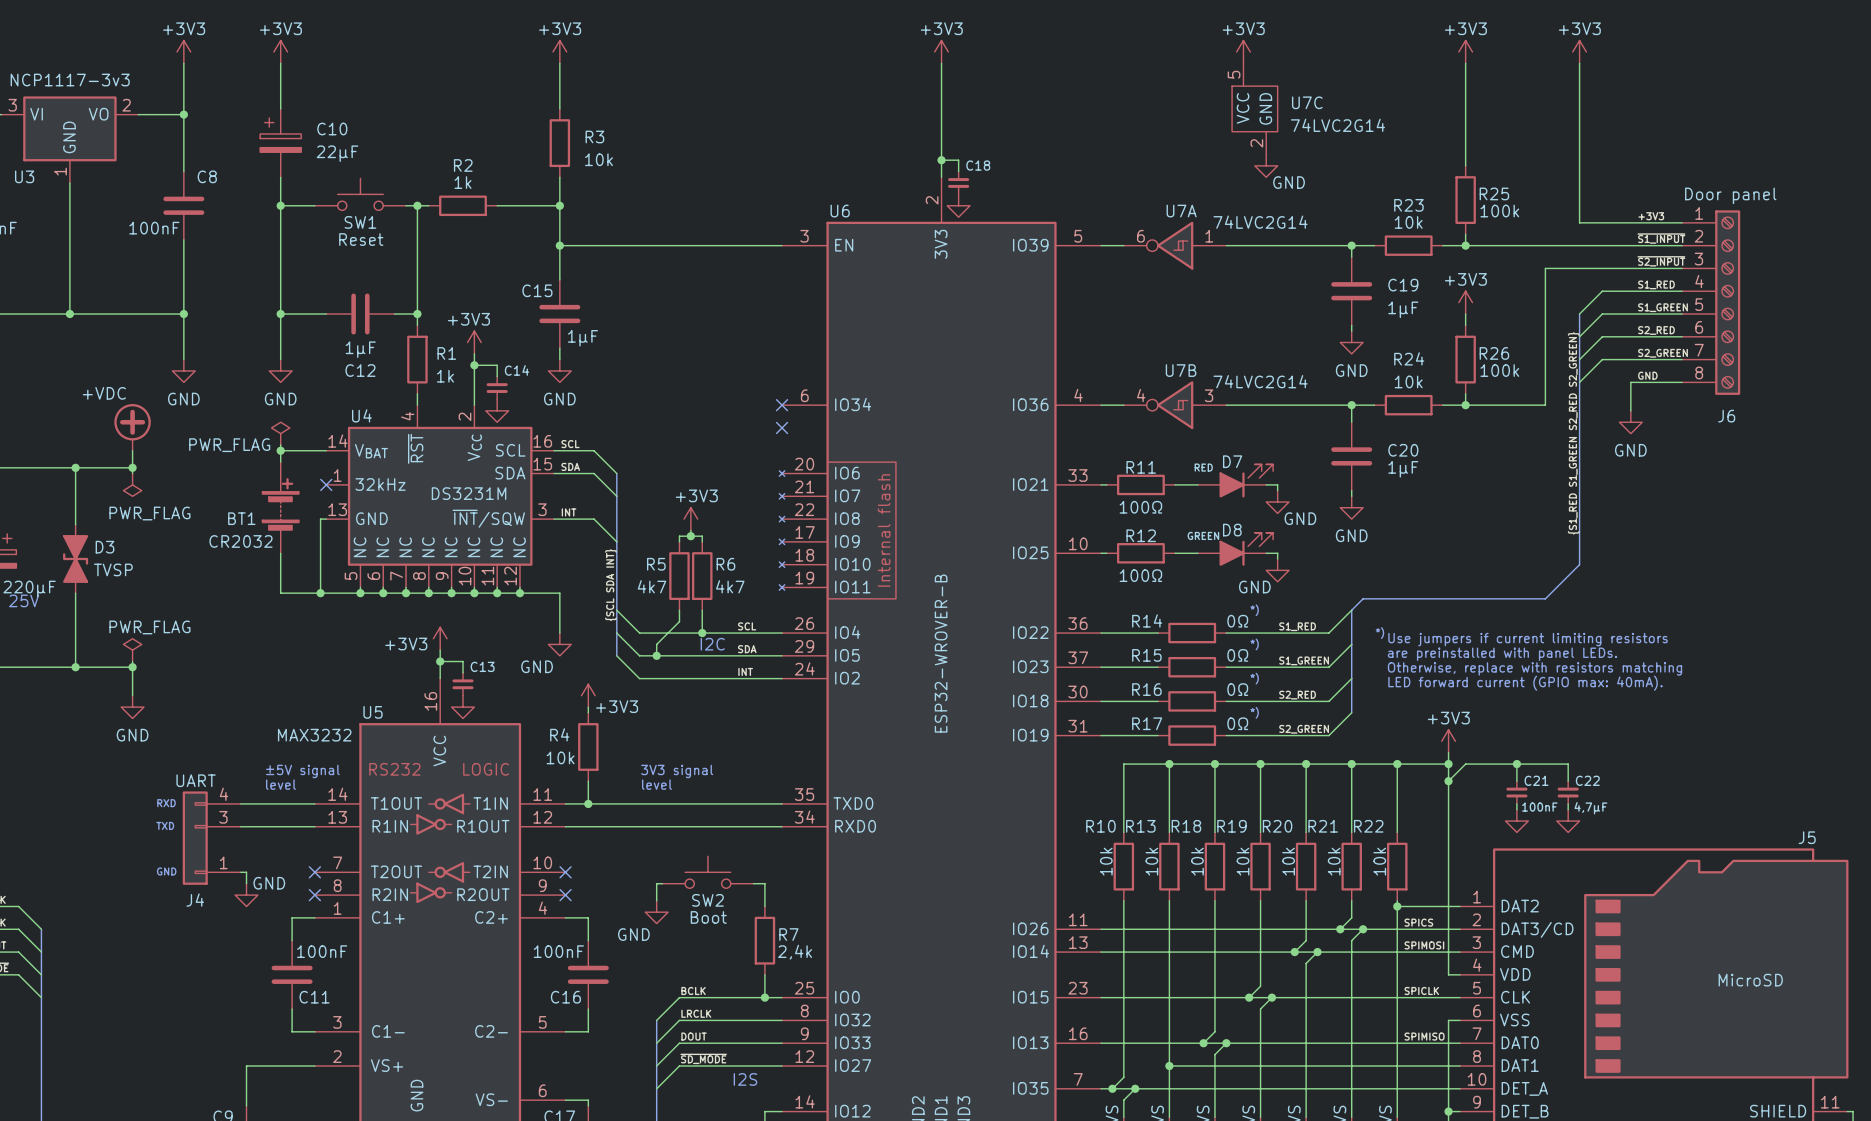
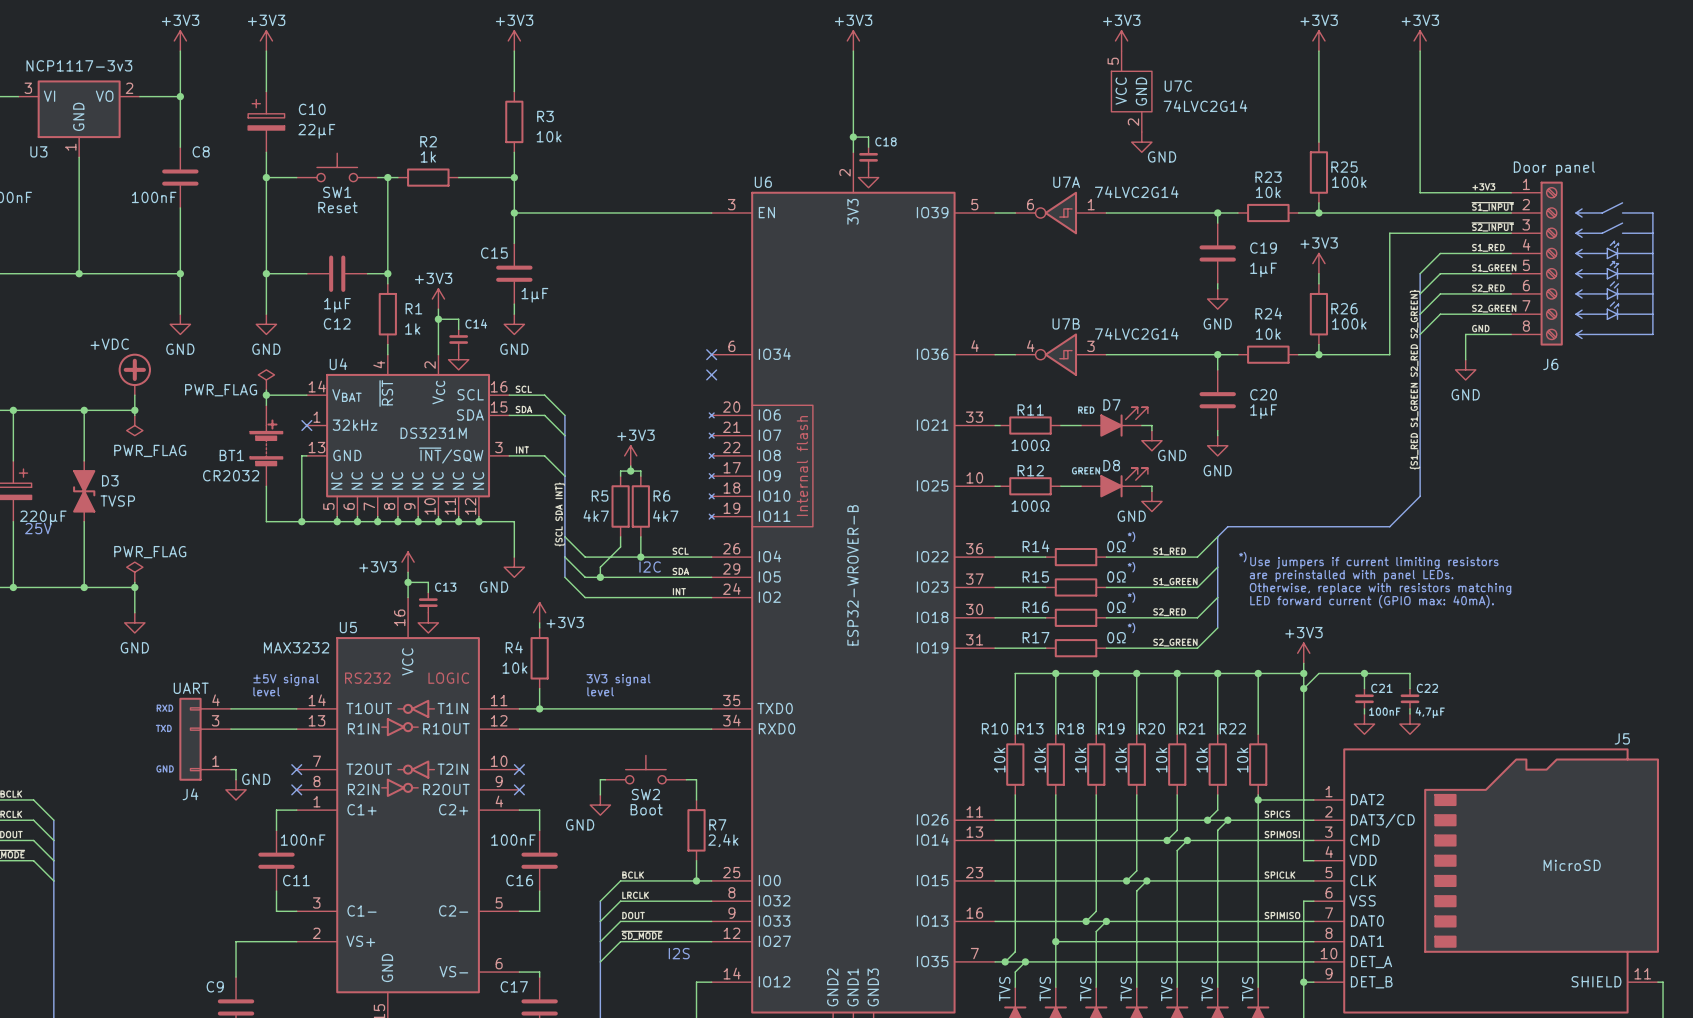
line: none -> (1622, 202) (1602, 212) (1576, 212)
line: none -> (1582, 208) (1575, 212) (1582, 217)
line: none -> (1622, 212) (1652, 212) (1652, 334) (1576, 334)
line: none -> (1622, 223) (1602, 233) (1576, 233)
line: none -> (1582, 229) (1575, 233) (1582, 237)
line: none -> (1622, 233) (1652, 233)
line: none -> (1614, 243) (1614, 241) (1610, 245)
line: none -> (1618, 245) (1618, 243) (1614, 247)
line: none -> (1617, 248) (1617, 258)
line: none -> (1582, 249) (1575, 253) (1582, 257)
line: none -> (1576, 253) (1607, 253)
line: none -> (1617, 253) (1652, 253)
line: none -> (1617, 253) (1607, 248) (1607, 258) (1617, 253)
line: none -> (1612, 261) (1614, 261)
line: none -> (1614, 261) (1610, 265)
line: none -> (1614, 261) (1614, 263)
line: none -> (1616, 263) (1618, 263) (1614, 267)
line: none -> (1617, 268) (1617, 278)
line: none -> (1582, 269) (1575, 273) (1582, 277)
line: none -> (1576, 273) (1607, 273)
line: none -> (1617, 273) (1652, 273)
line: none -> (1617, 273) (1607, 268) (1607, 278) (1617, 273)
line: none -> (1614, 281) (1610, 285)
line: none -> (1618, 283) (1614, 287)
line: none -> (1617, 288) (1617, 299)
line: none -> (1582, 289) (1575, 293) (1582, 298)
line: none -> (1576, 293) (1607, 293)
line: none -> (1617, 293) (1652, 293)
line: none -> (1617, 293) (1607, 288) (1607, 299) (1617, 293)
line: none -> (1614, 302) (1610, 306)
line: none -> (1618, 306) (1618, 304) (1614, 308)
line: none -> (1617, 309) (1617, 319)
line: none -> (1582, 310) (1575, 314) (1582, 318)
line: none -> (1576, 314) (1607, 314)
line: none -> (1617, 314) (1652, 314)
line: none -> (1617, 314) (1607, 309) (1607, 319) (1617, 314)
line: none -> (1582, 330) (1575, 334) (1582, 338)

